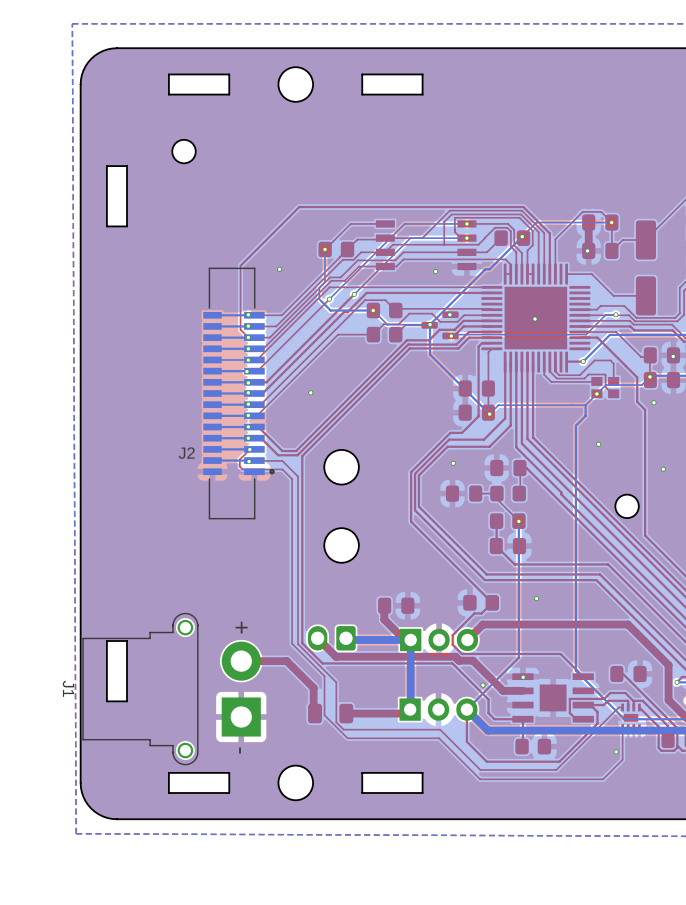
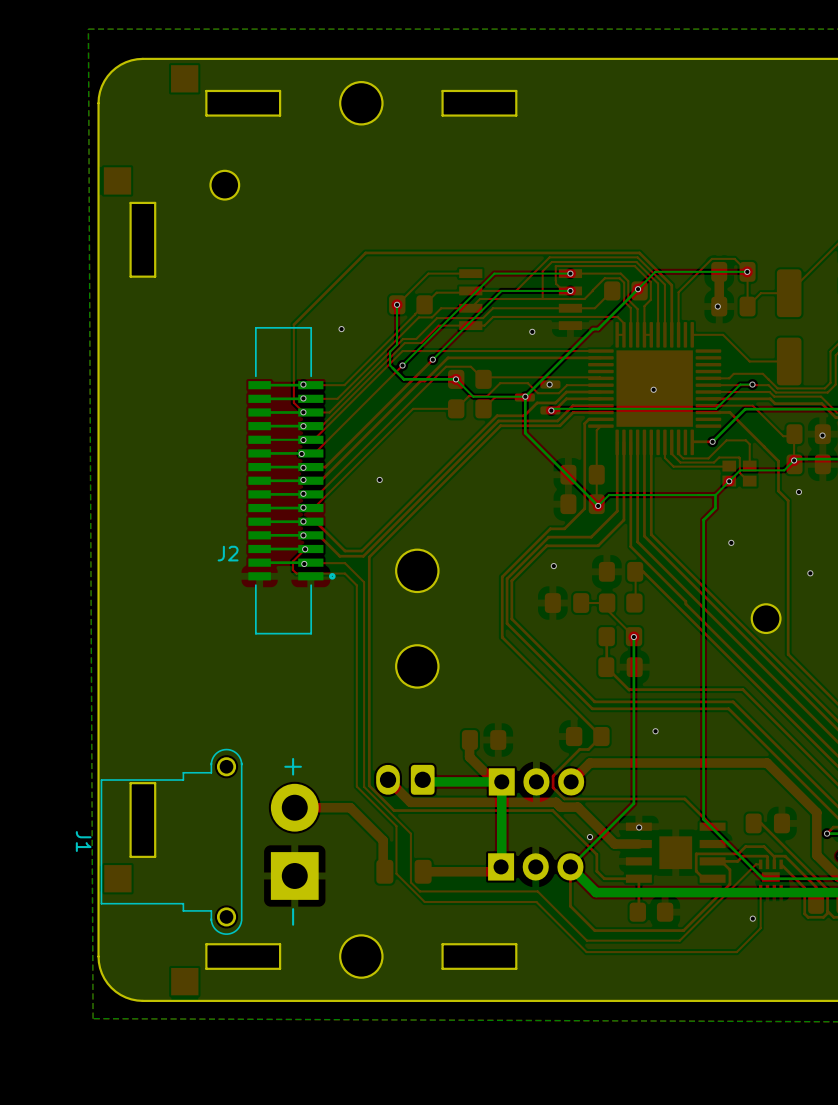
part: none -> (184, 78)
part: none -> (117, 180)
part: none -> (117, 878)
part: none -> (184, 981)

